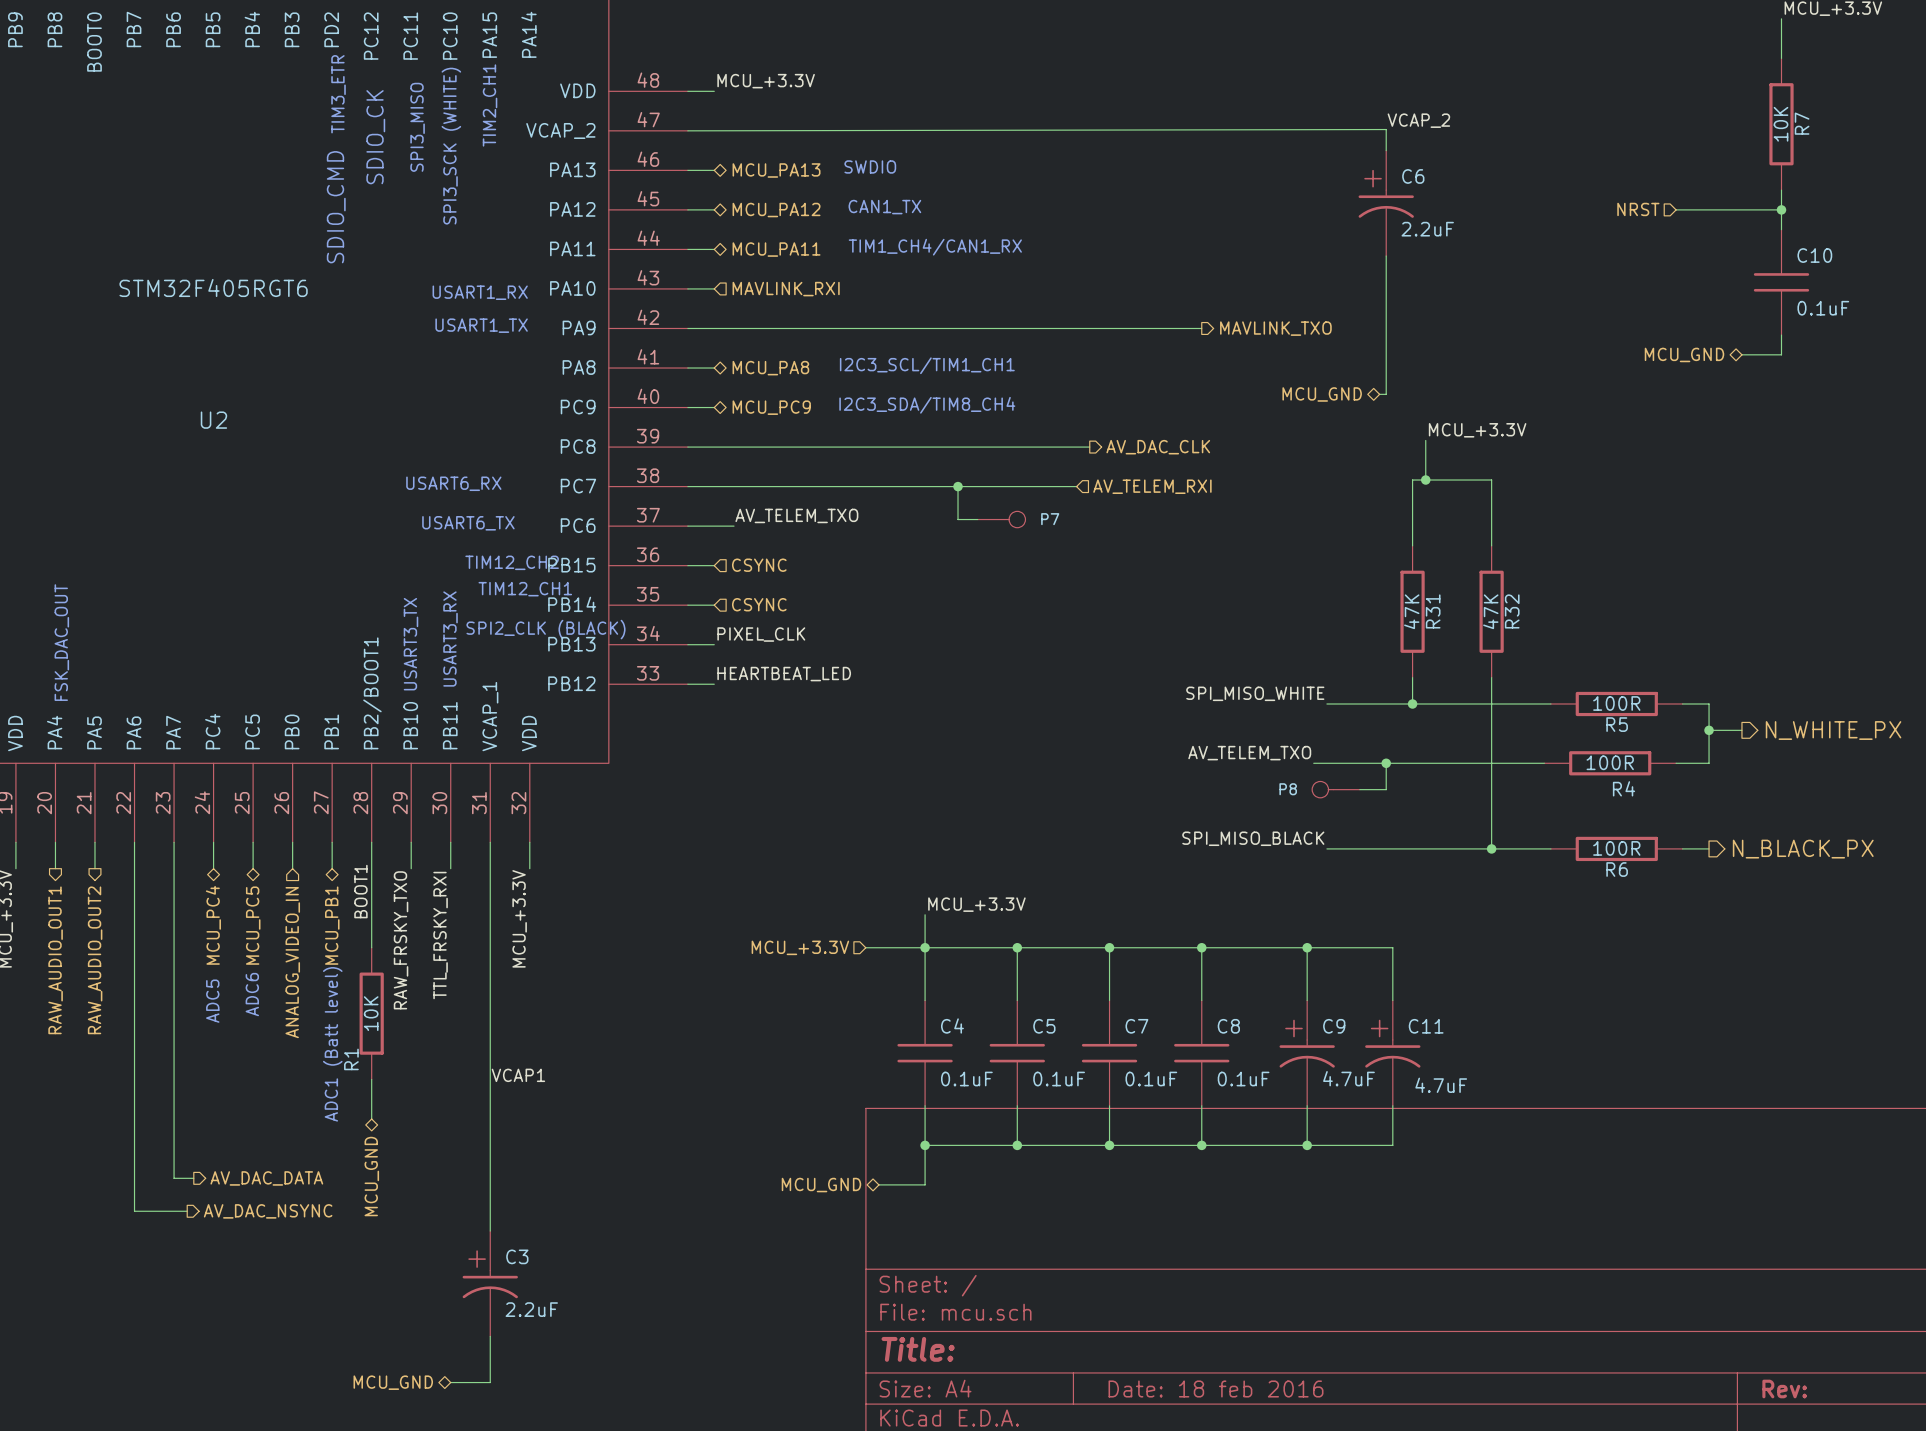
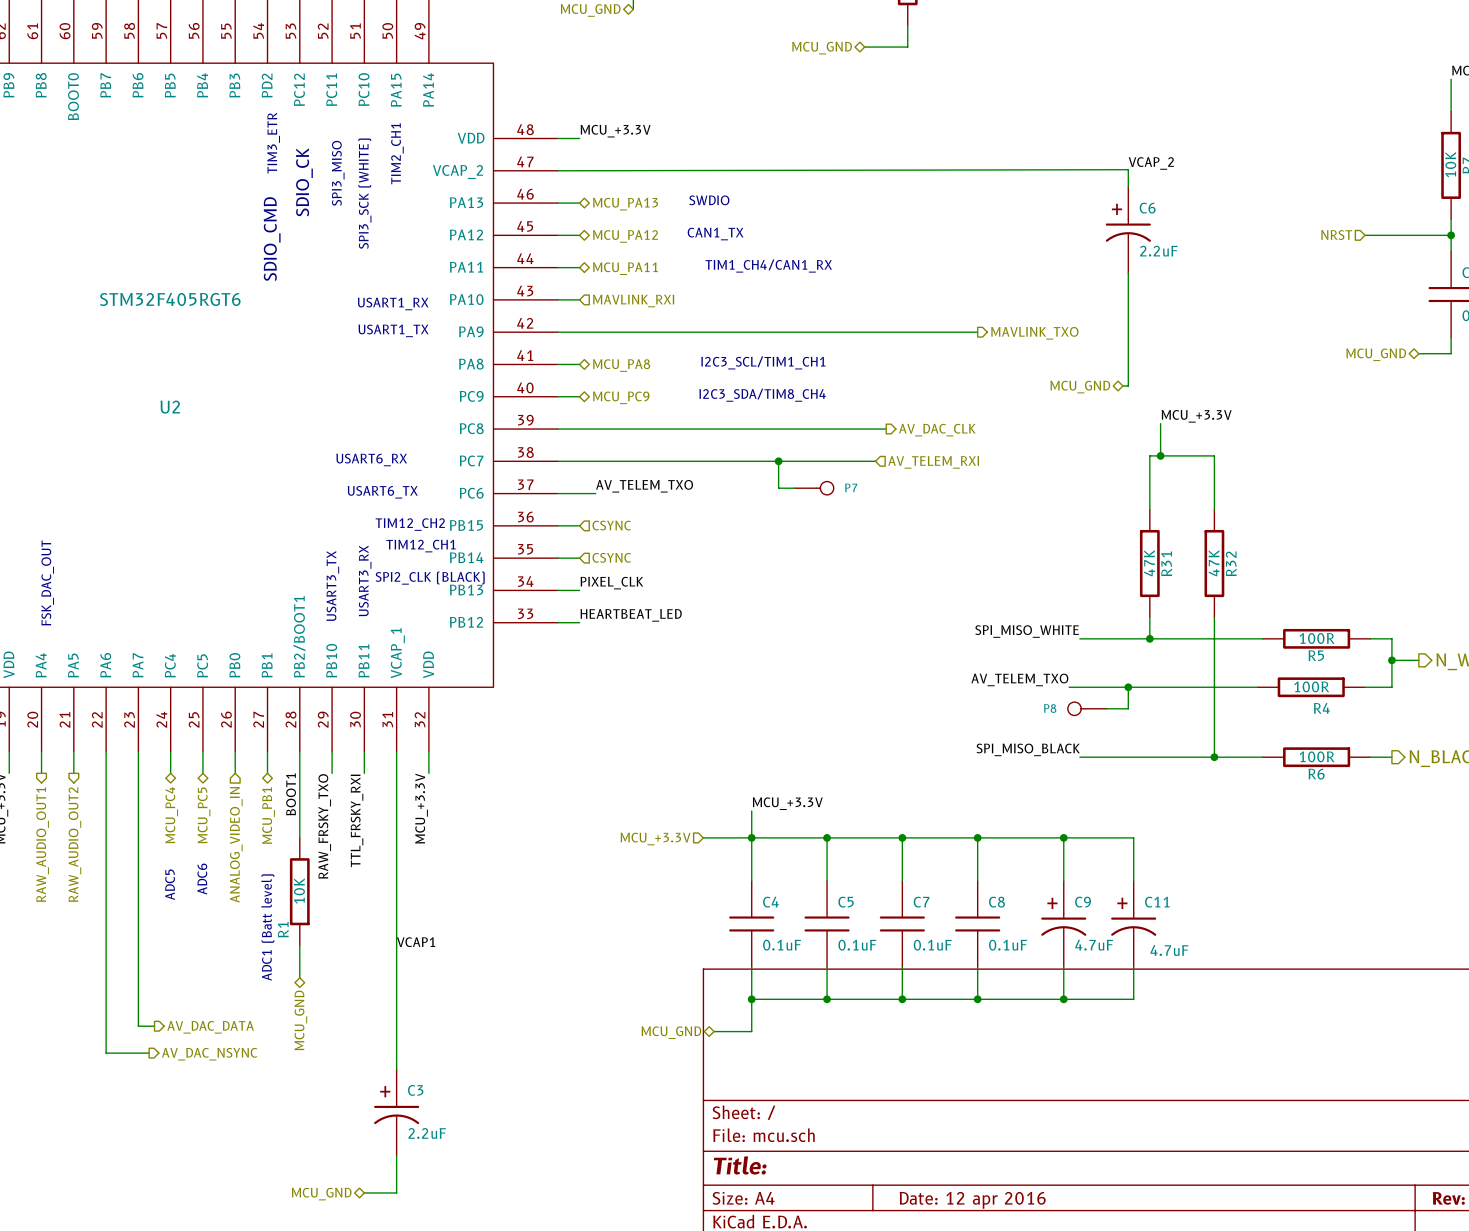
title block: Date: 18 feb 2016 (1216, 1388) -> Date: 12 apr 2016 (972, 1200)

